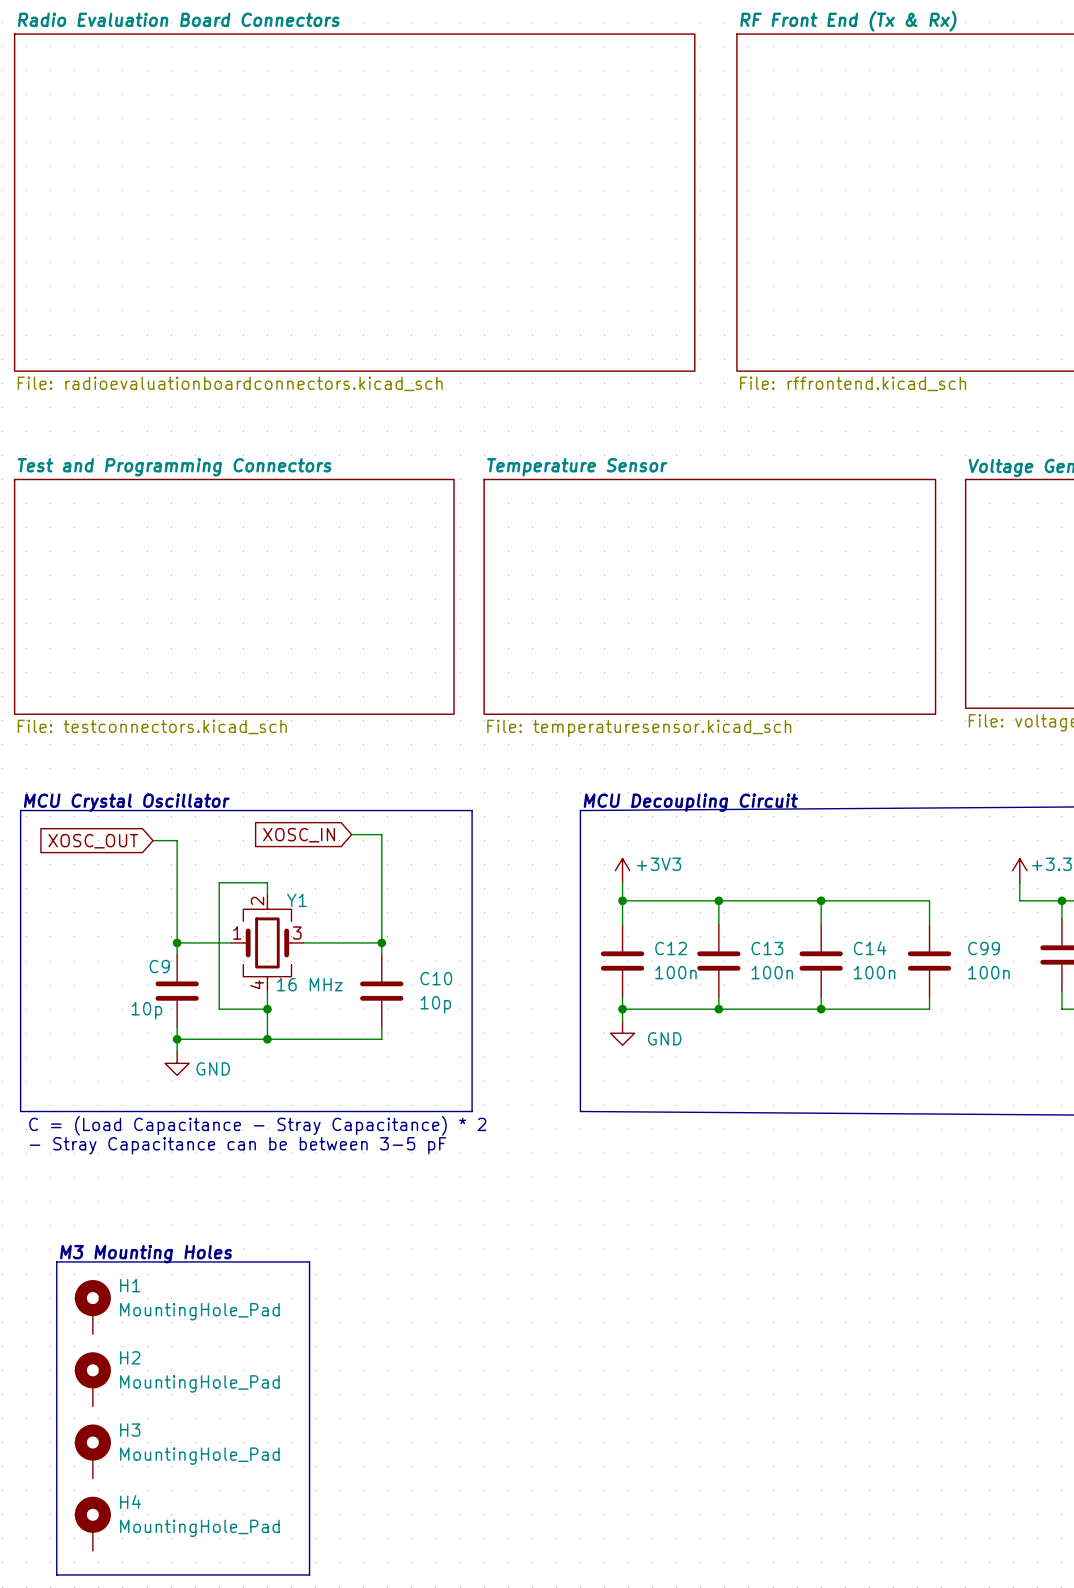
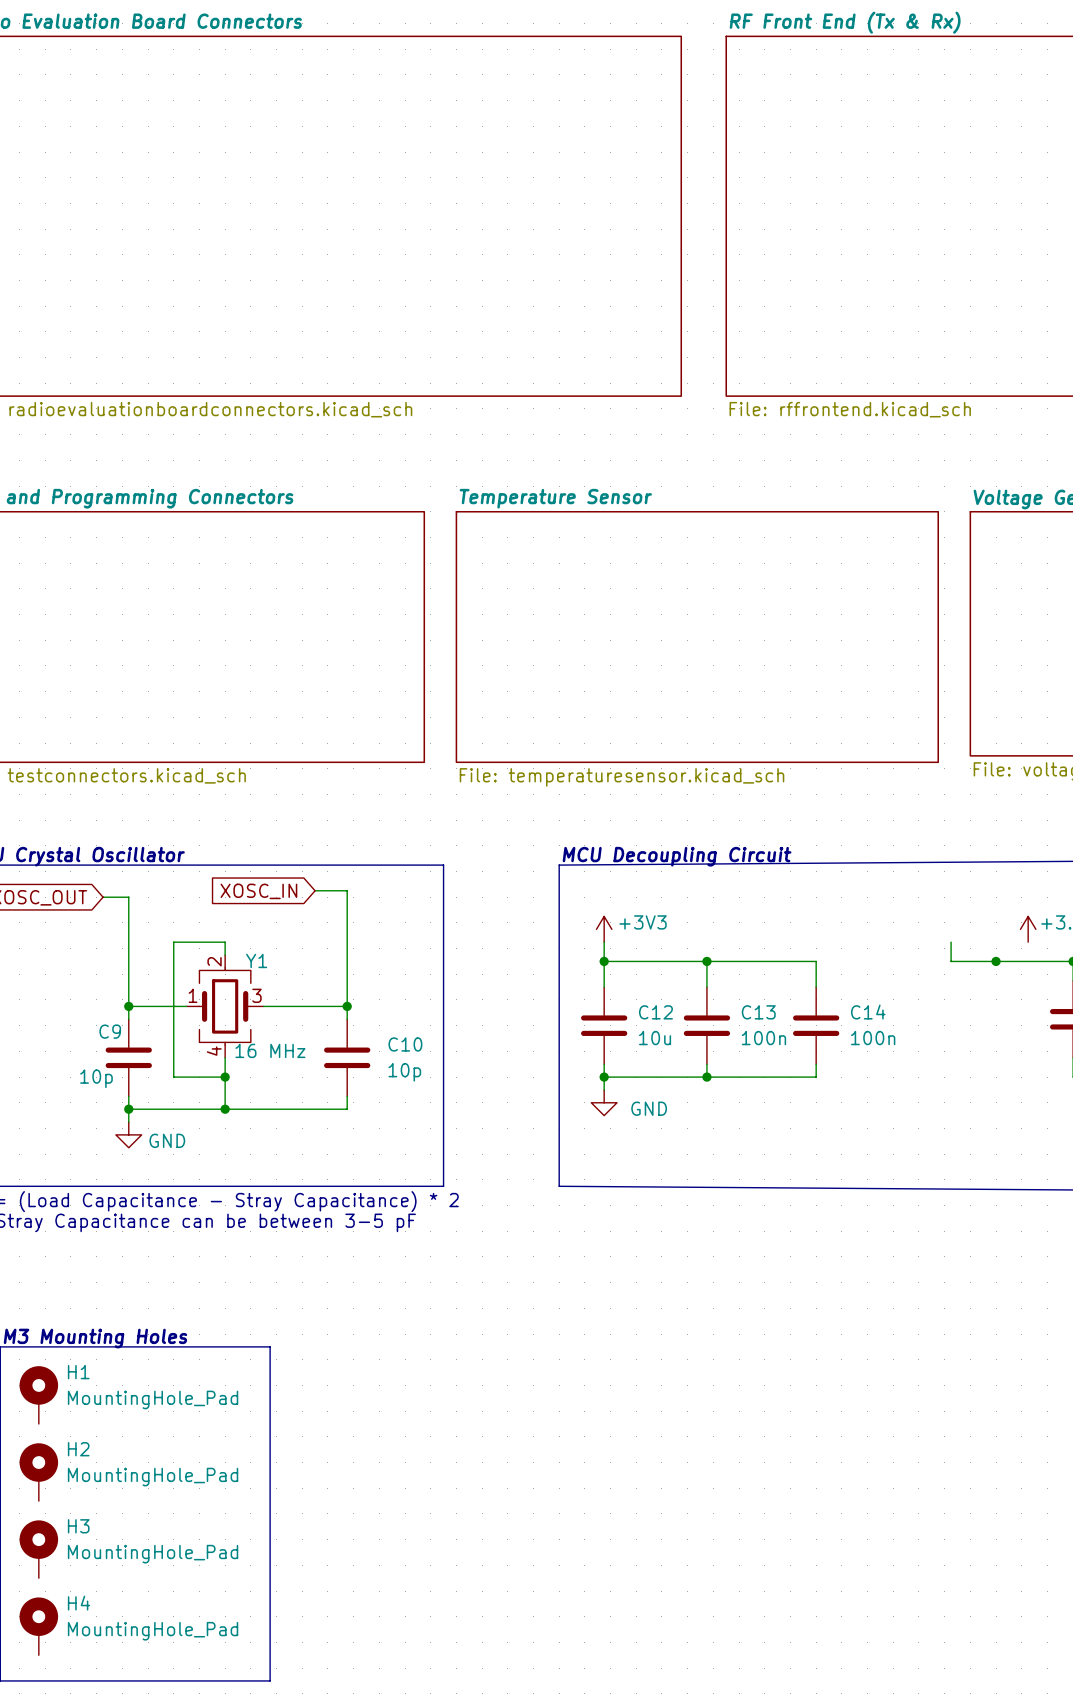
wire: (1019, 882) (1019, 900) -> (951, 942) (951, 961) (1028, 961)
wire: (821, 900) (929, 900) (929, 924) -> none
junction: (821, 900) -> none
junction: none -> (996, 961)
C99: 100n (929, 961) -> none
C12 value: 100n (675, 972) -> 10u (655, 1038)
wire: (929, 997) (929, 1009) (821, 1009) -> none
junction: (821, 1009) -> none

